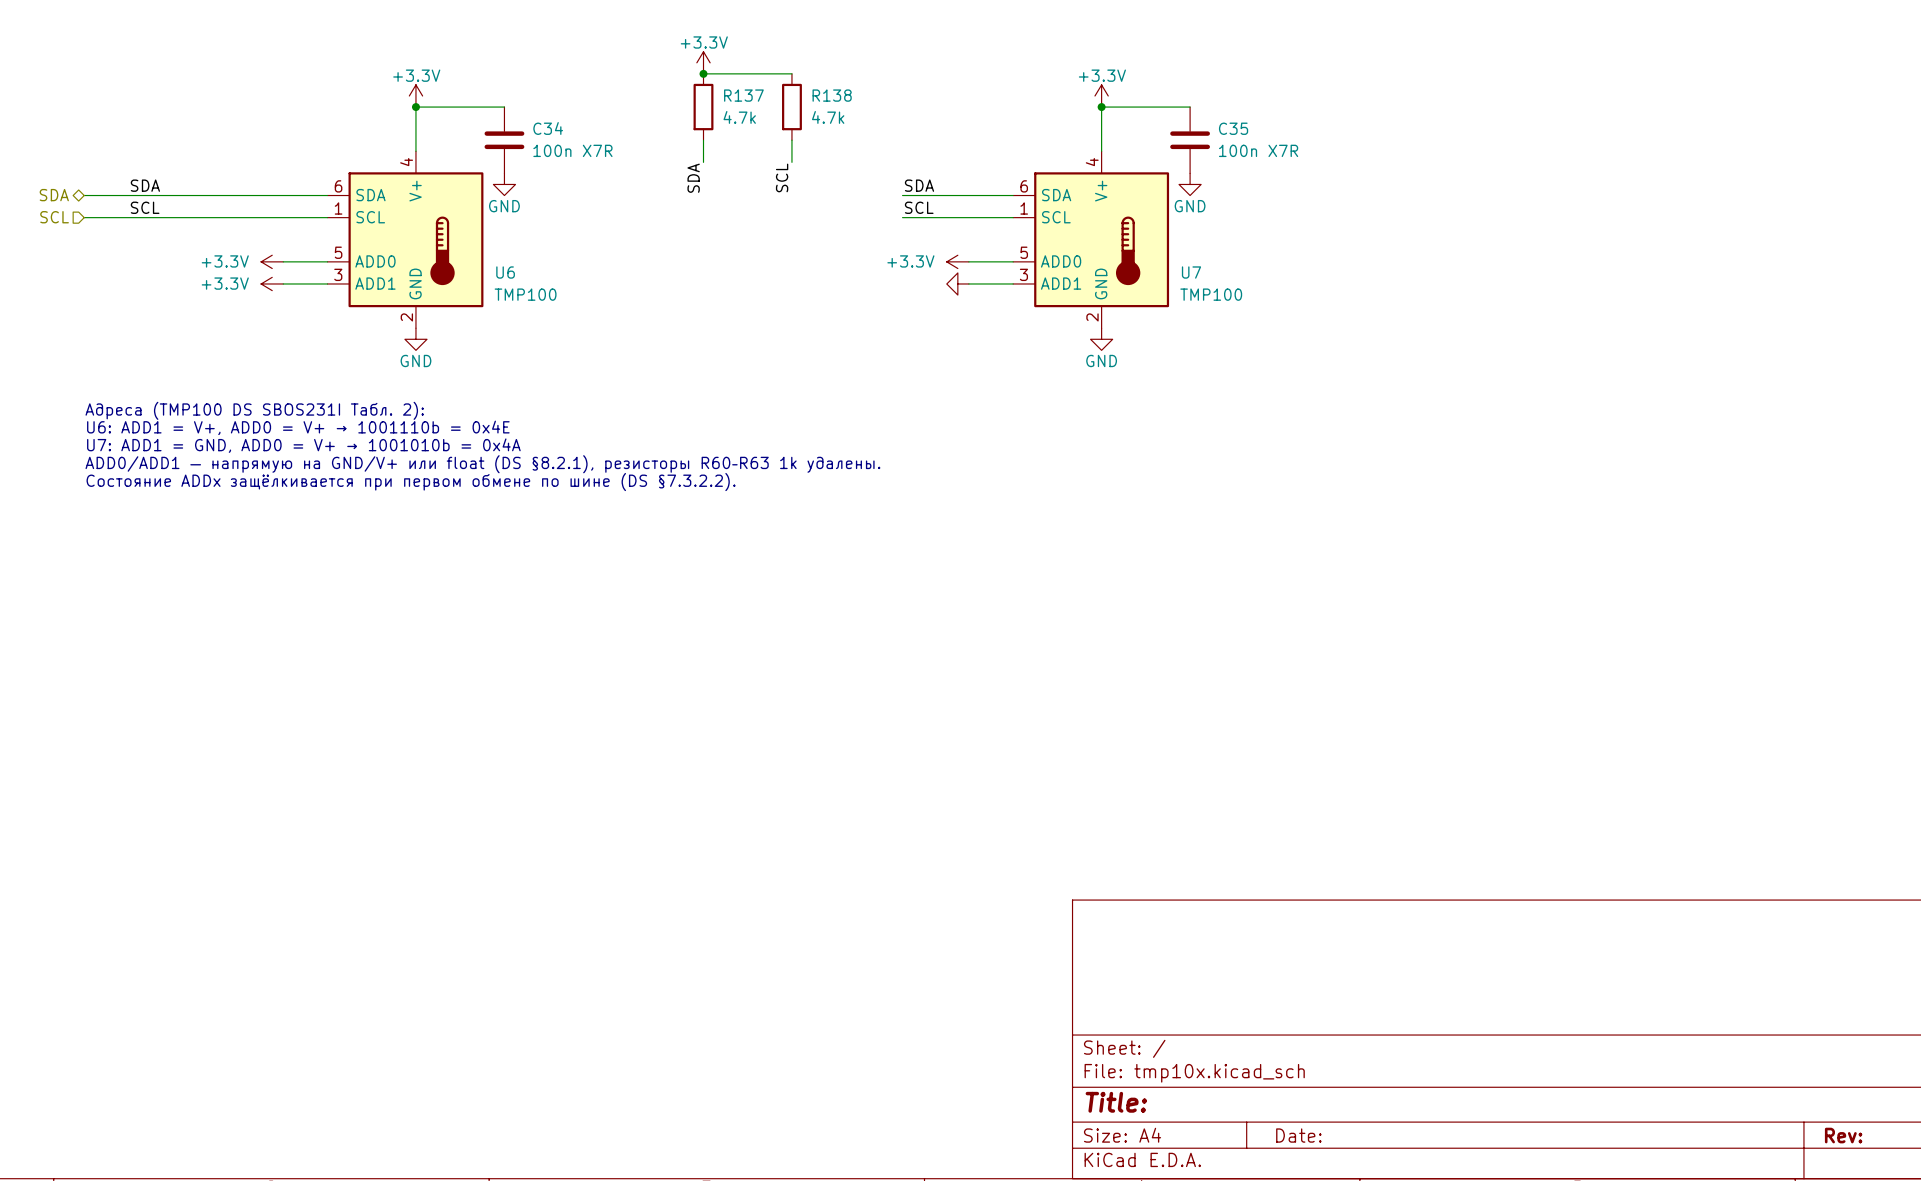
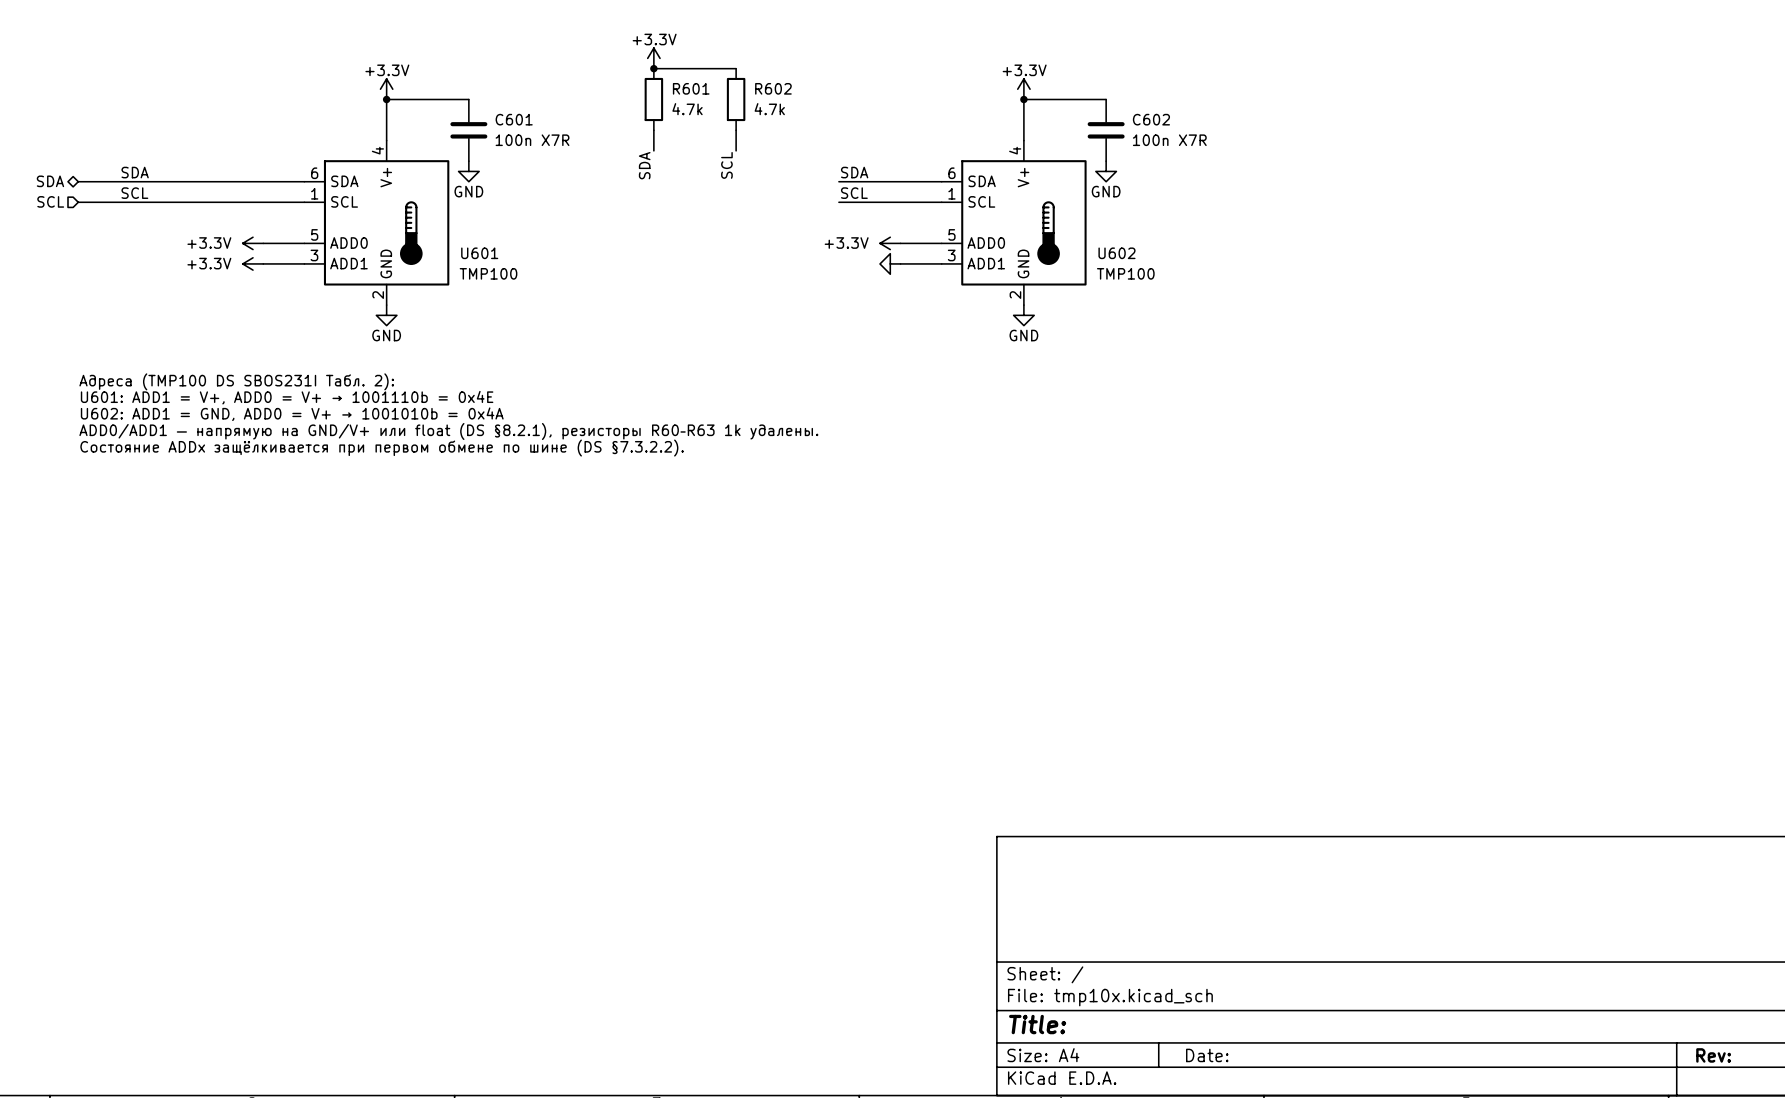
R137 name: R137 (743, 95) -> R601 (691, 88)
R138 name: R138 (832, 95) -> R602 (773, 88)
C34 name: C34 (548, 128) -> C601 (514, 119)
C35 name: C35 (1233, 128) -> C602 (1151, 119)
U6 name: U6 (505, 272) -> U601 (479, 253)
U7 name: U7 (1191, 272) -> U602 (1116, 253)
text: U6: ADD1 = V+, ADD0 = V+ → 1001110b = 0x4E (298, 427) -> U601: ADD1 = V+, ADD0 = V+ → 1001110b = 0x4E (287, 397)
text: U7: ADD1 = GND, ADD0 = V+ → 1001010b = 0x4A (303, 445) -> U602: ADD1 = GND, ADD0 = V+ → 1001010b = 0x4A (292, 414)

